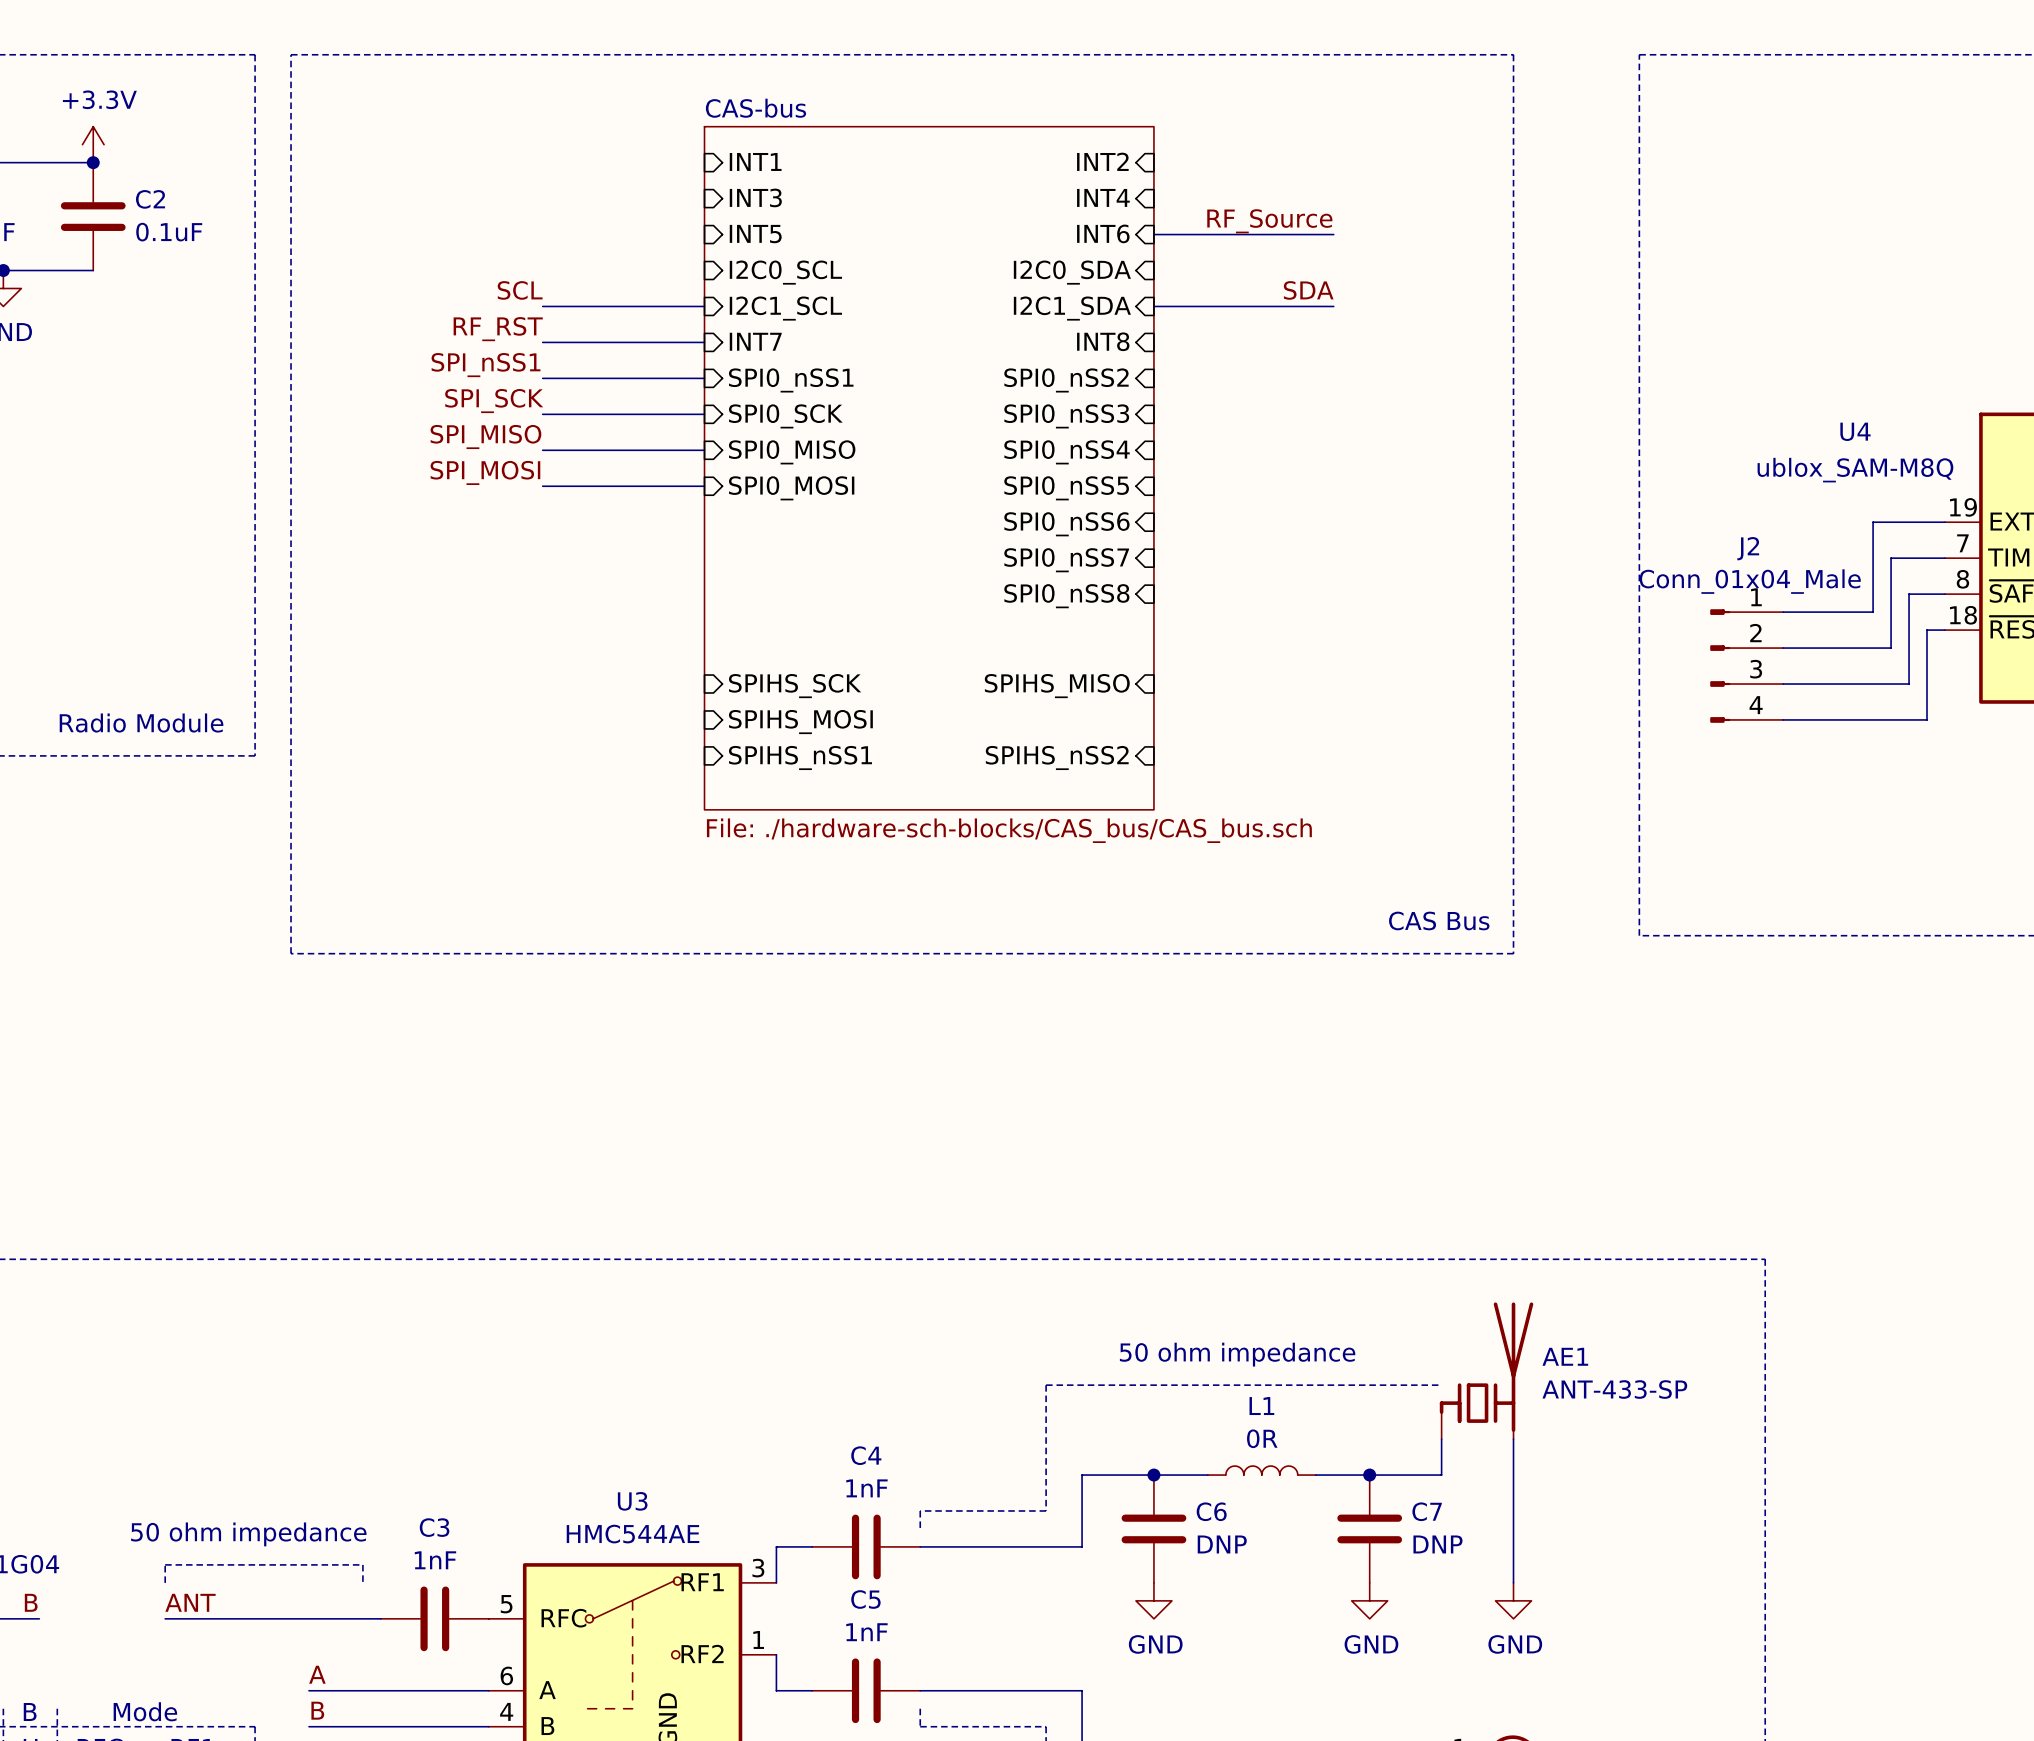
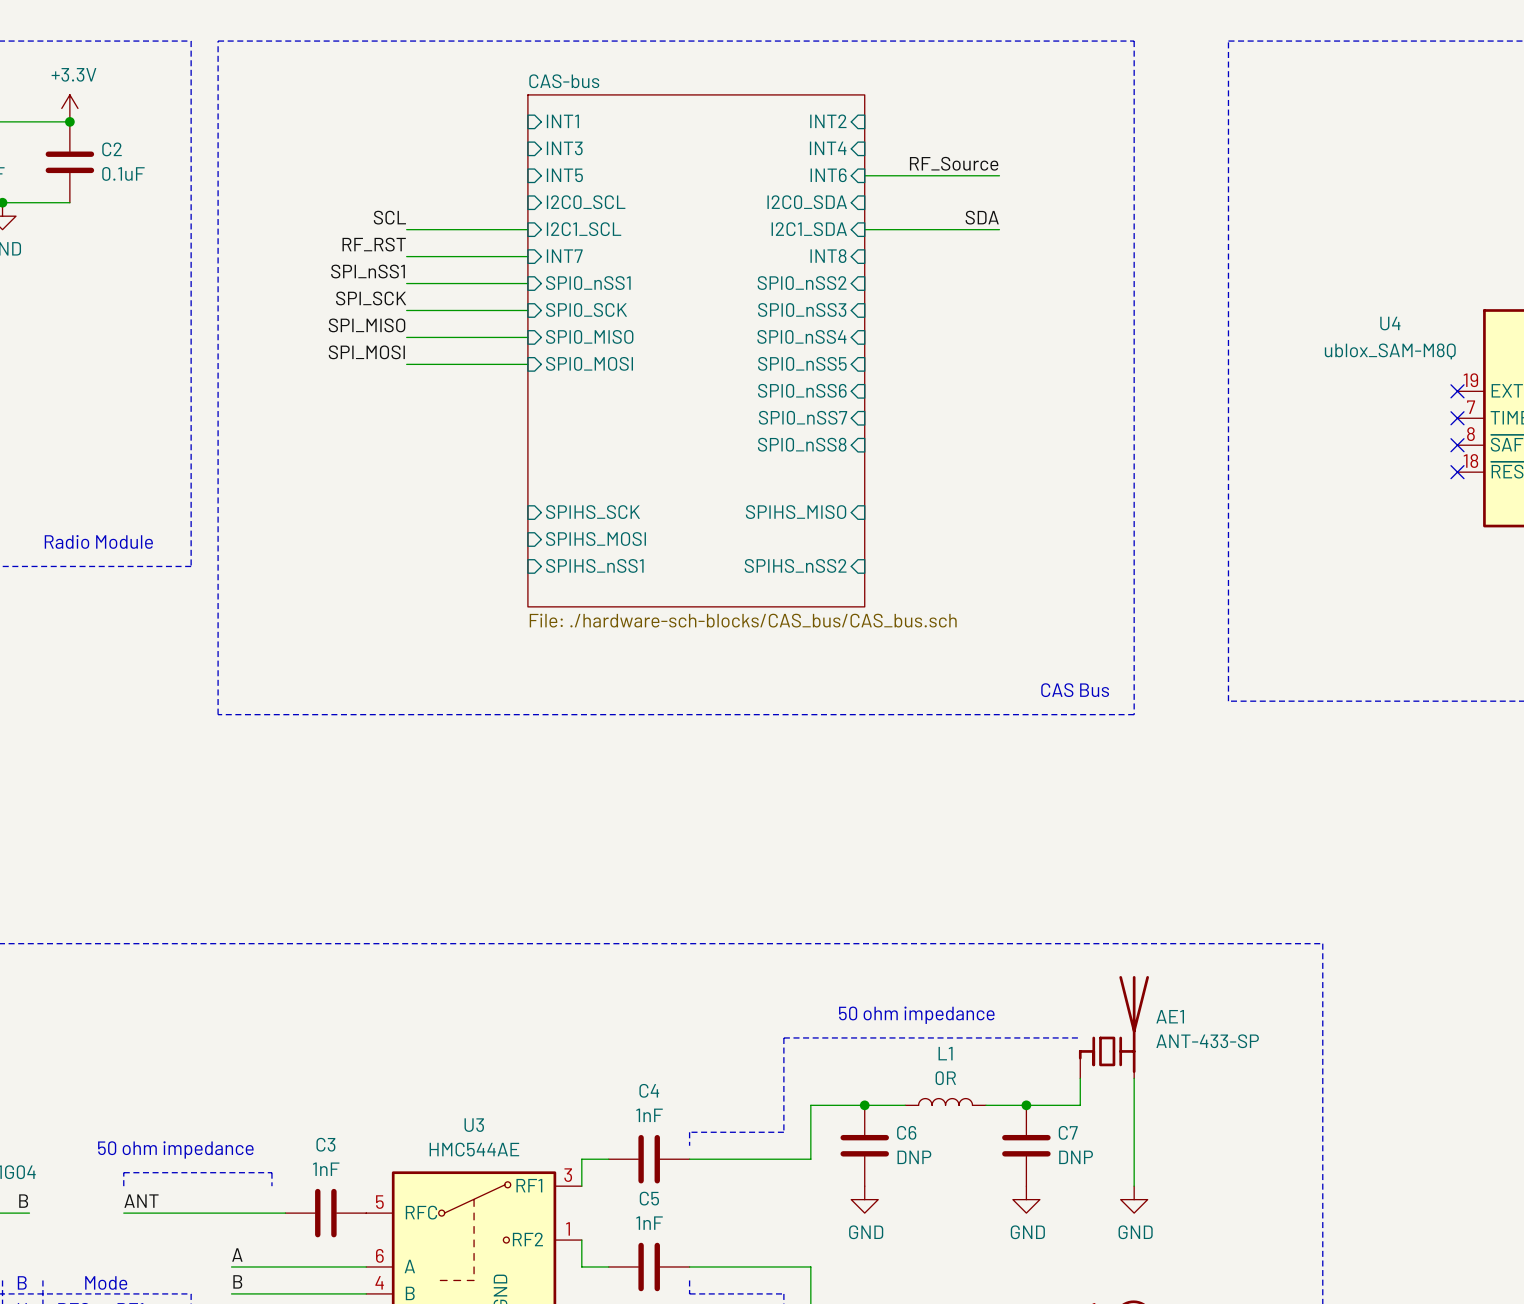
wire: (1944, 522) (1873, 522) (1873, 612) (1783, 612) -> none
no-connect mark: none -> (1457, 391)
wire: (1944, 558) (1891, 558) (1891, 648) (1783, 648) -> none
no-connect mark: none -> (1457, 418)
wire: (1944, 594) (1909, 594) (1909, 684) (1783, 684) -> none
no-connect mark: none -> (1457, 445)
wire: (1944, 630) (1927, 630) (1927, 719) (1783, 719) -> none
no-connect mark: none -> (1457, 472)
J2: Conn_01x04_Male (1746, 666) -> none

